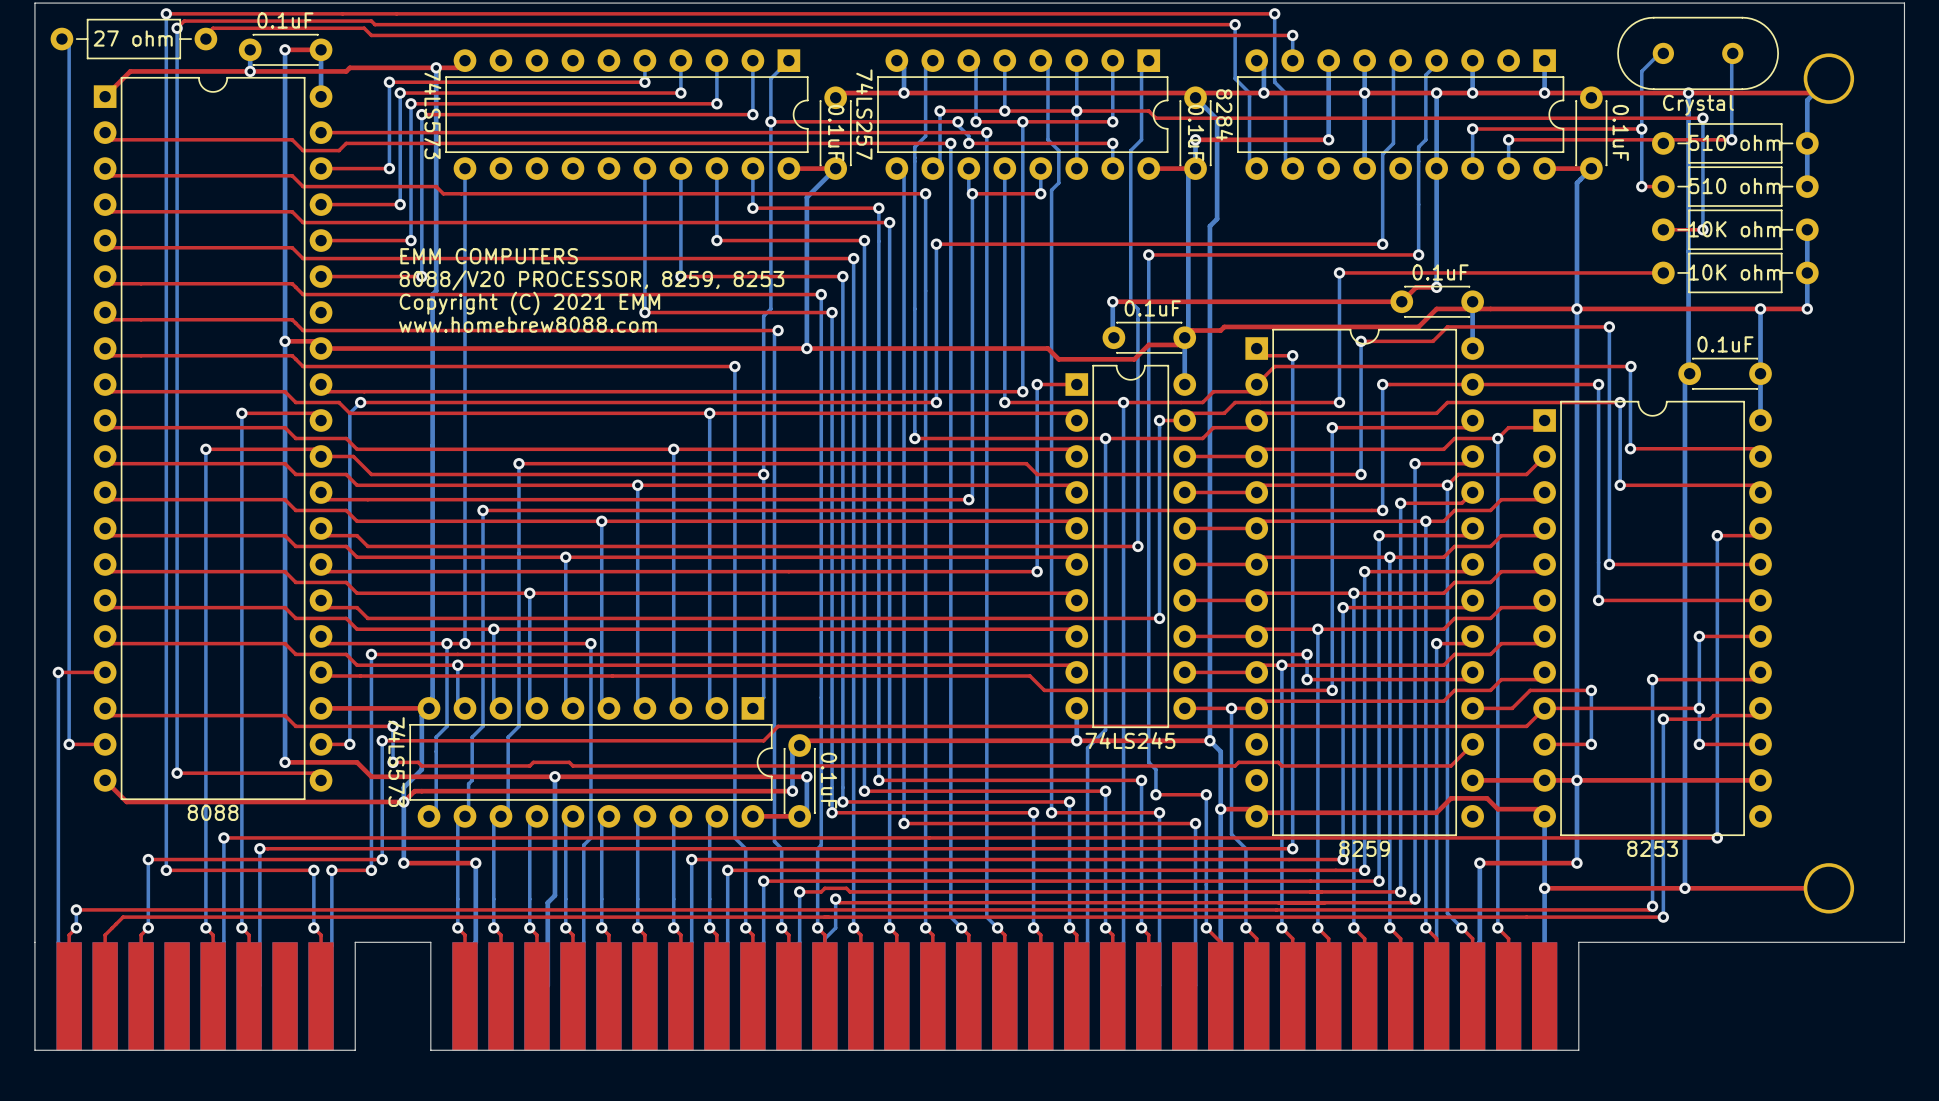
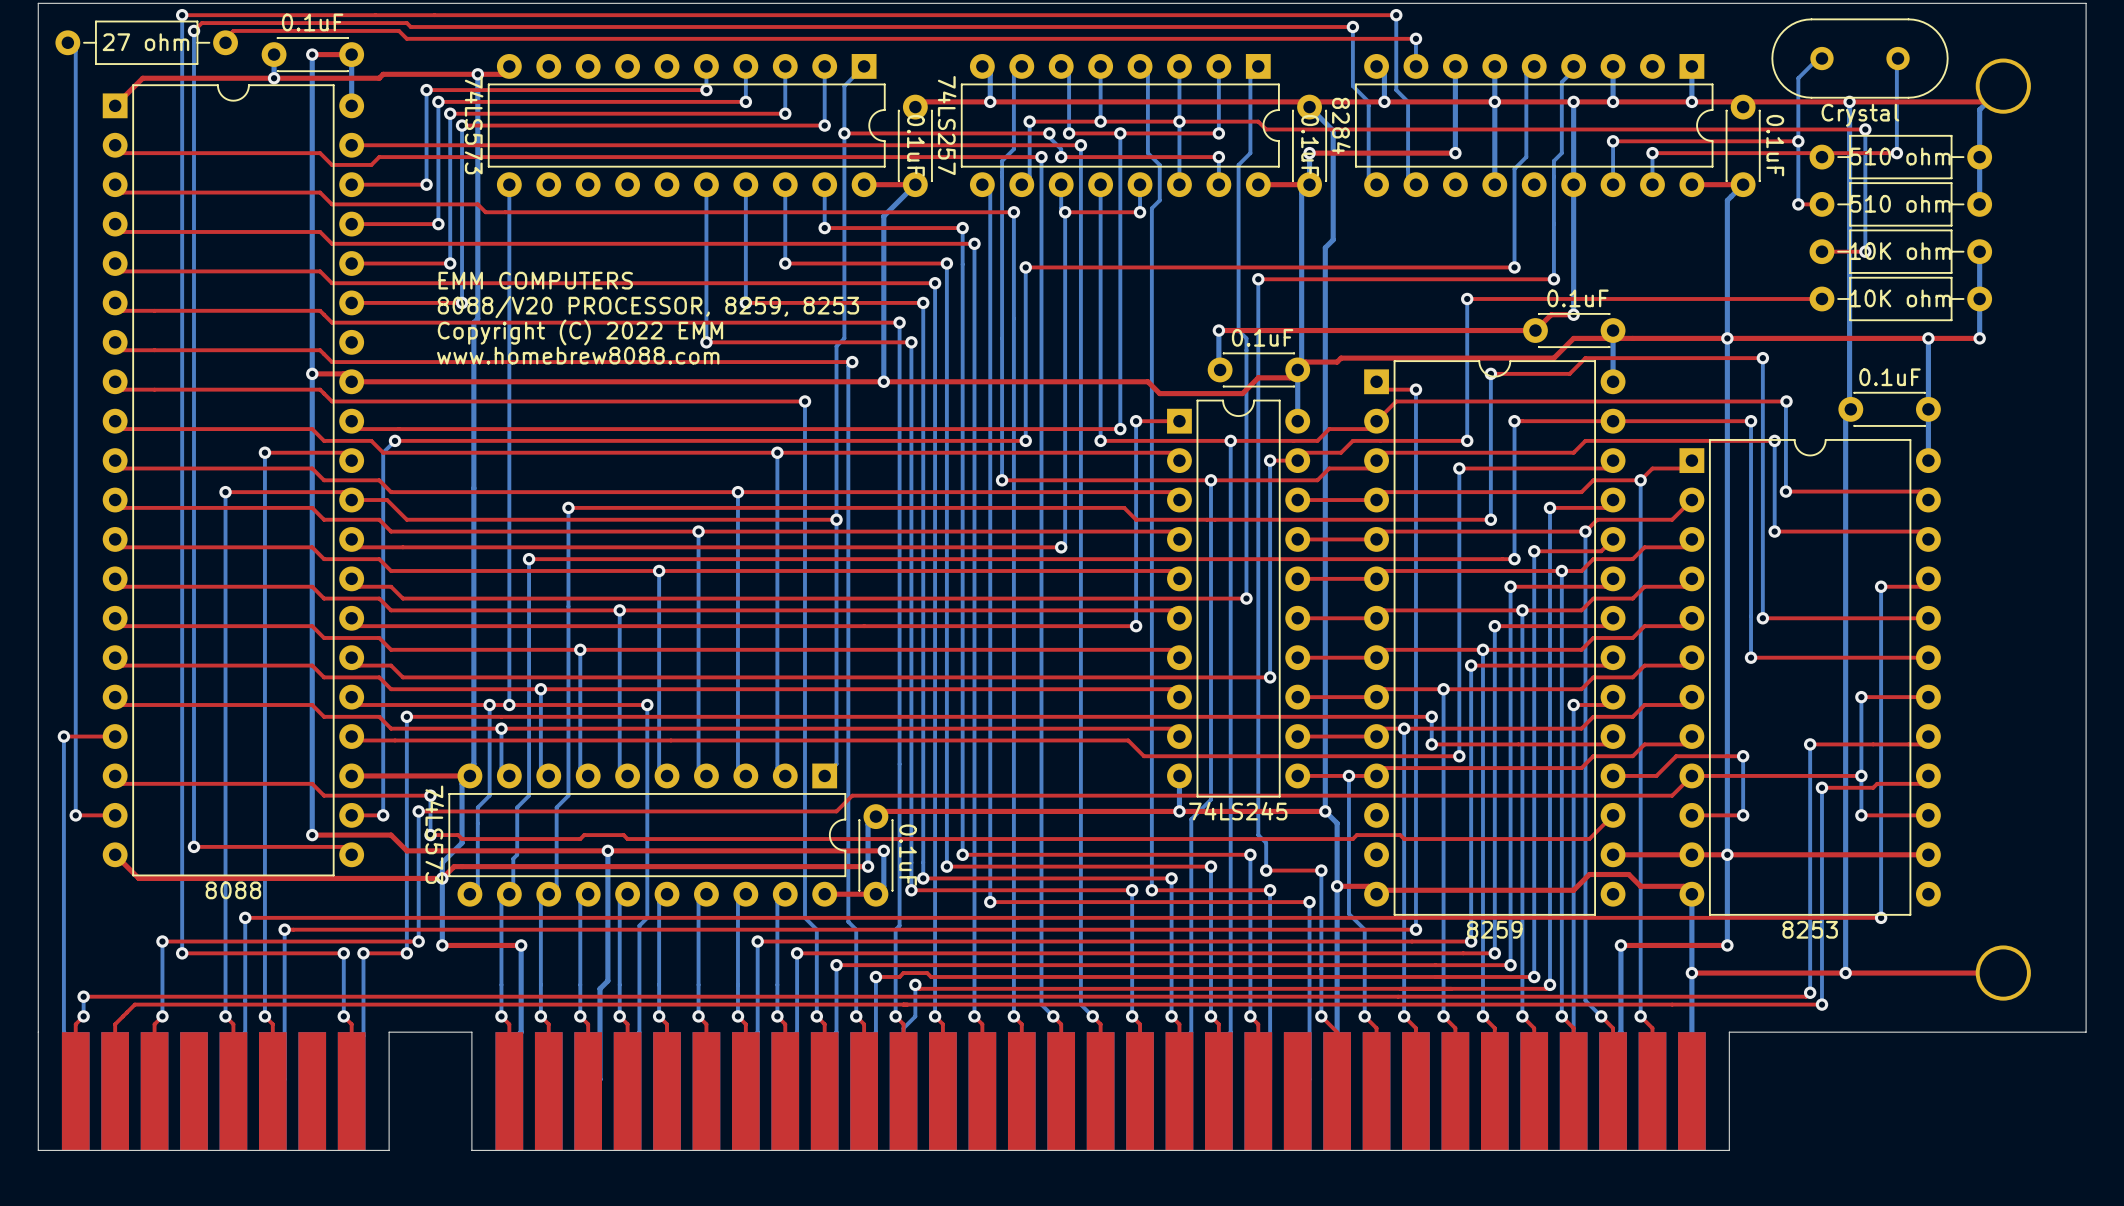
text: Copyright (C) 2021 EMM (529, 303) -> Copyright (C) 2022 EMM (580, 332)

